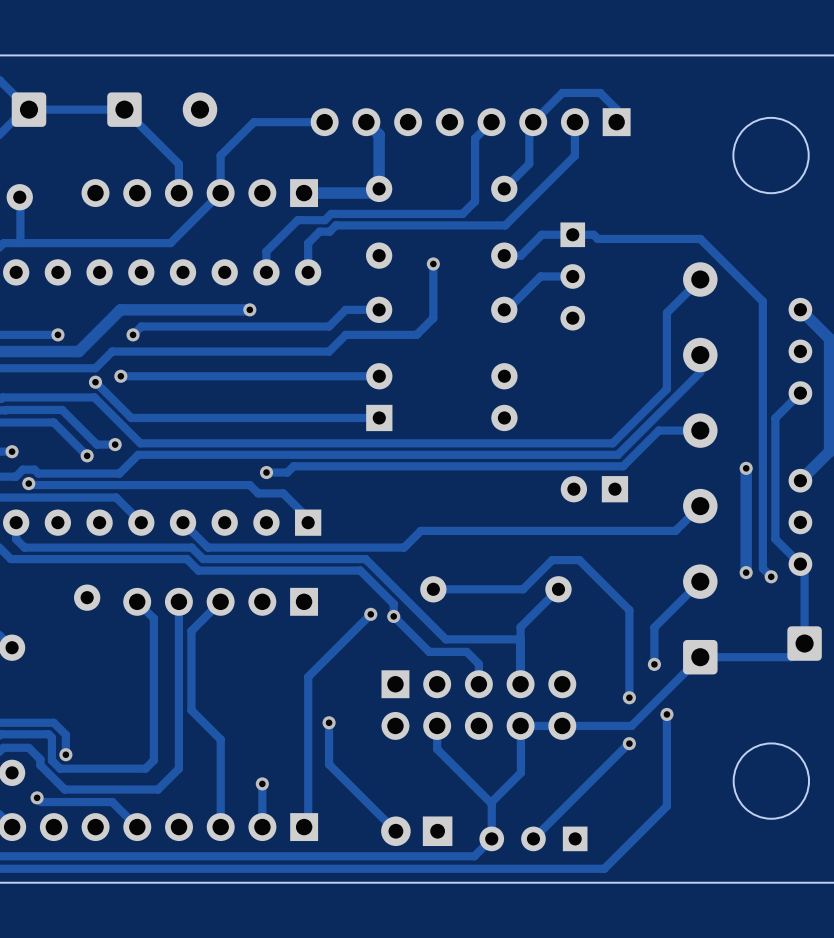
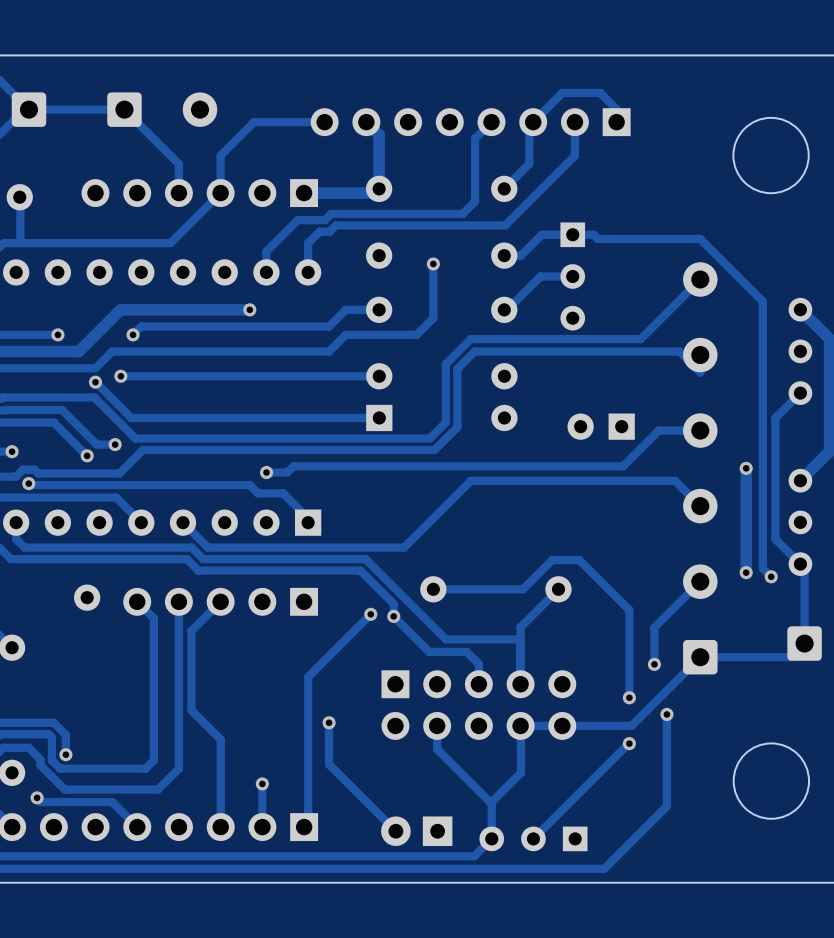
track: (666, 312) (666, 389) (612, 443) (140, 443) (135, 438) -> (666, 312) (640, 339) (470, 339) (445, 364) (445, 422) (429, 438) (135, 438)
track: (700, 372) (617, 454) (138, 454) -> (700, 372) (679, 351) (474, 351) (457, 368) (457, 427) (434, 449) (143, 449) (138, 454)
part position: (594, 489) -> (601, 426)
track: (700, 506) (675, 530) (420, 530) -> (700, 506) (675, 480) (470, 480) (420, 530)

